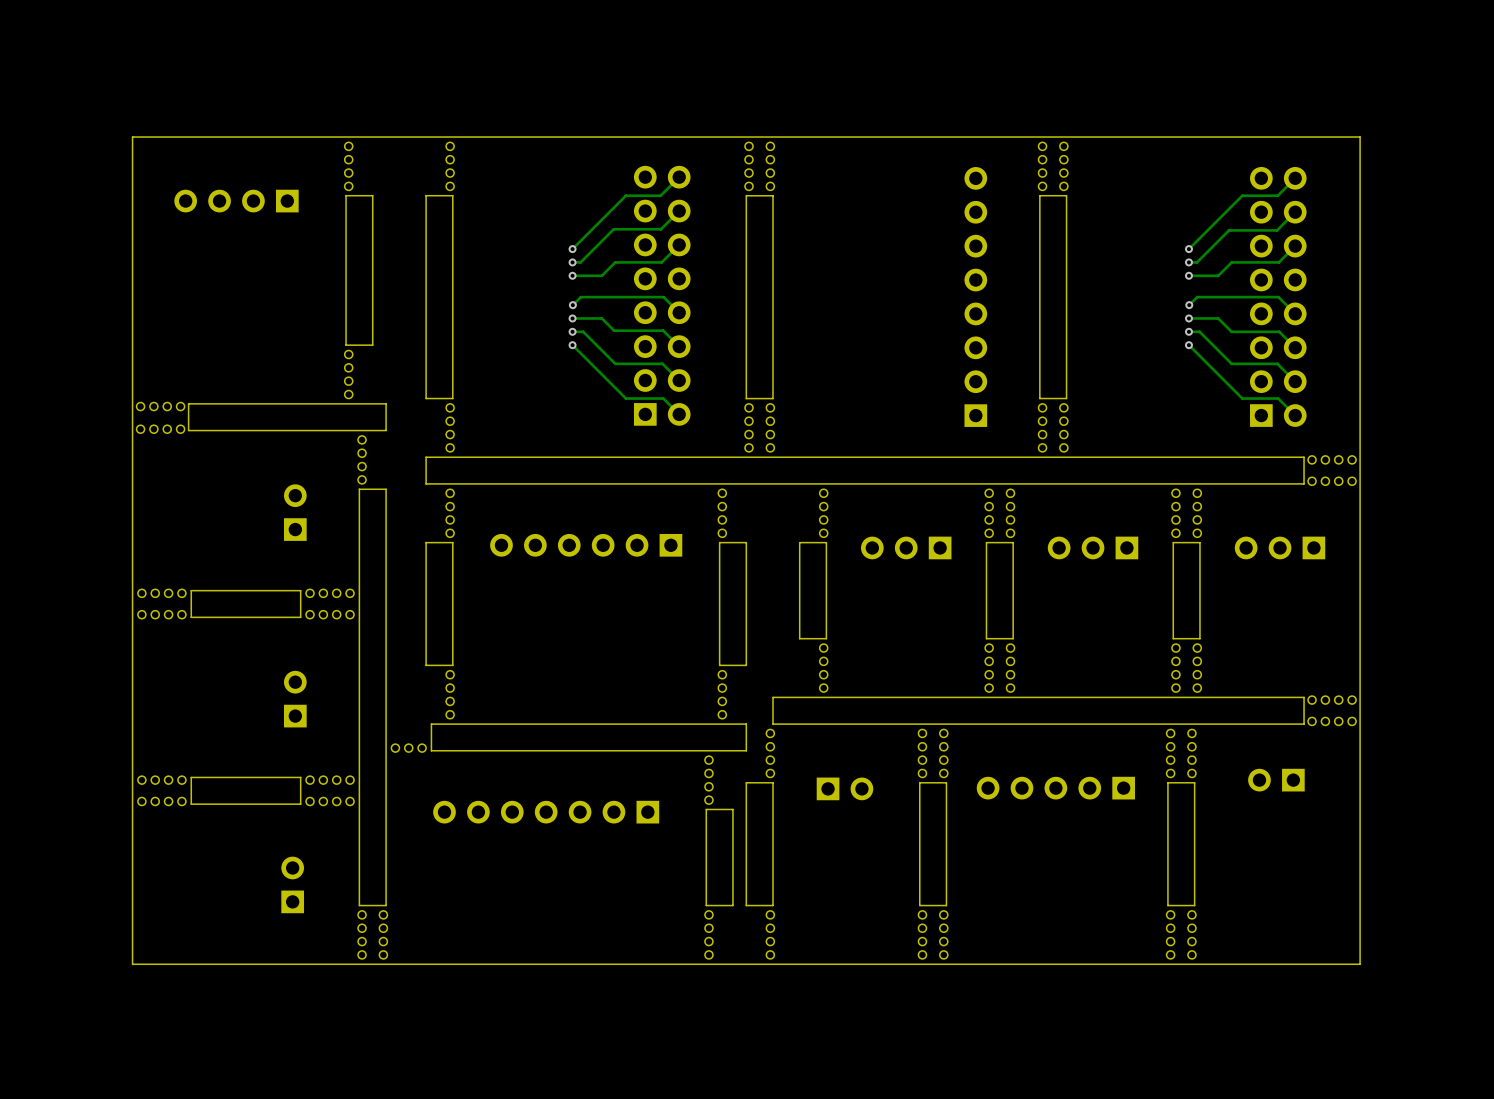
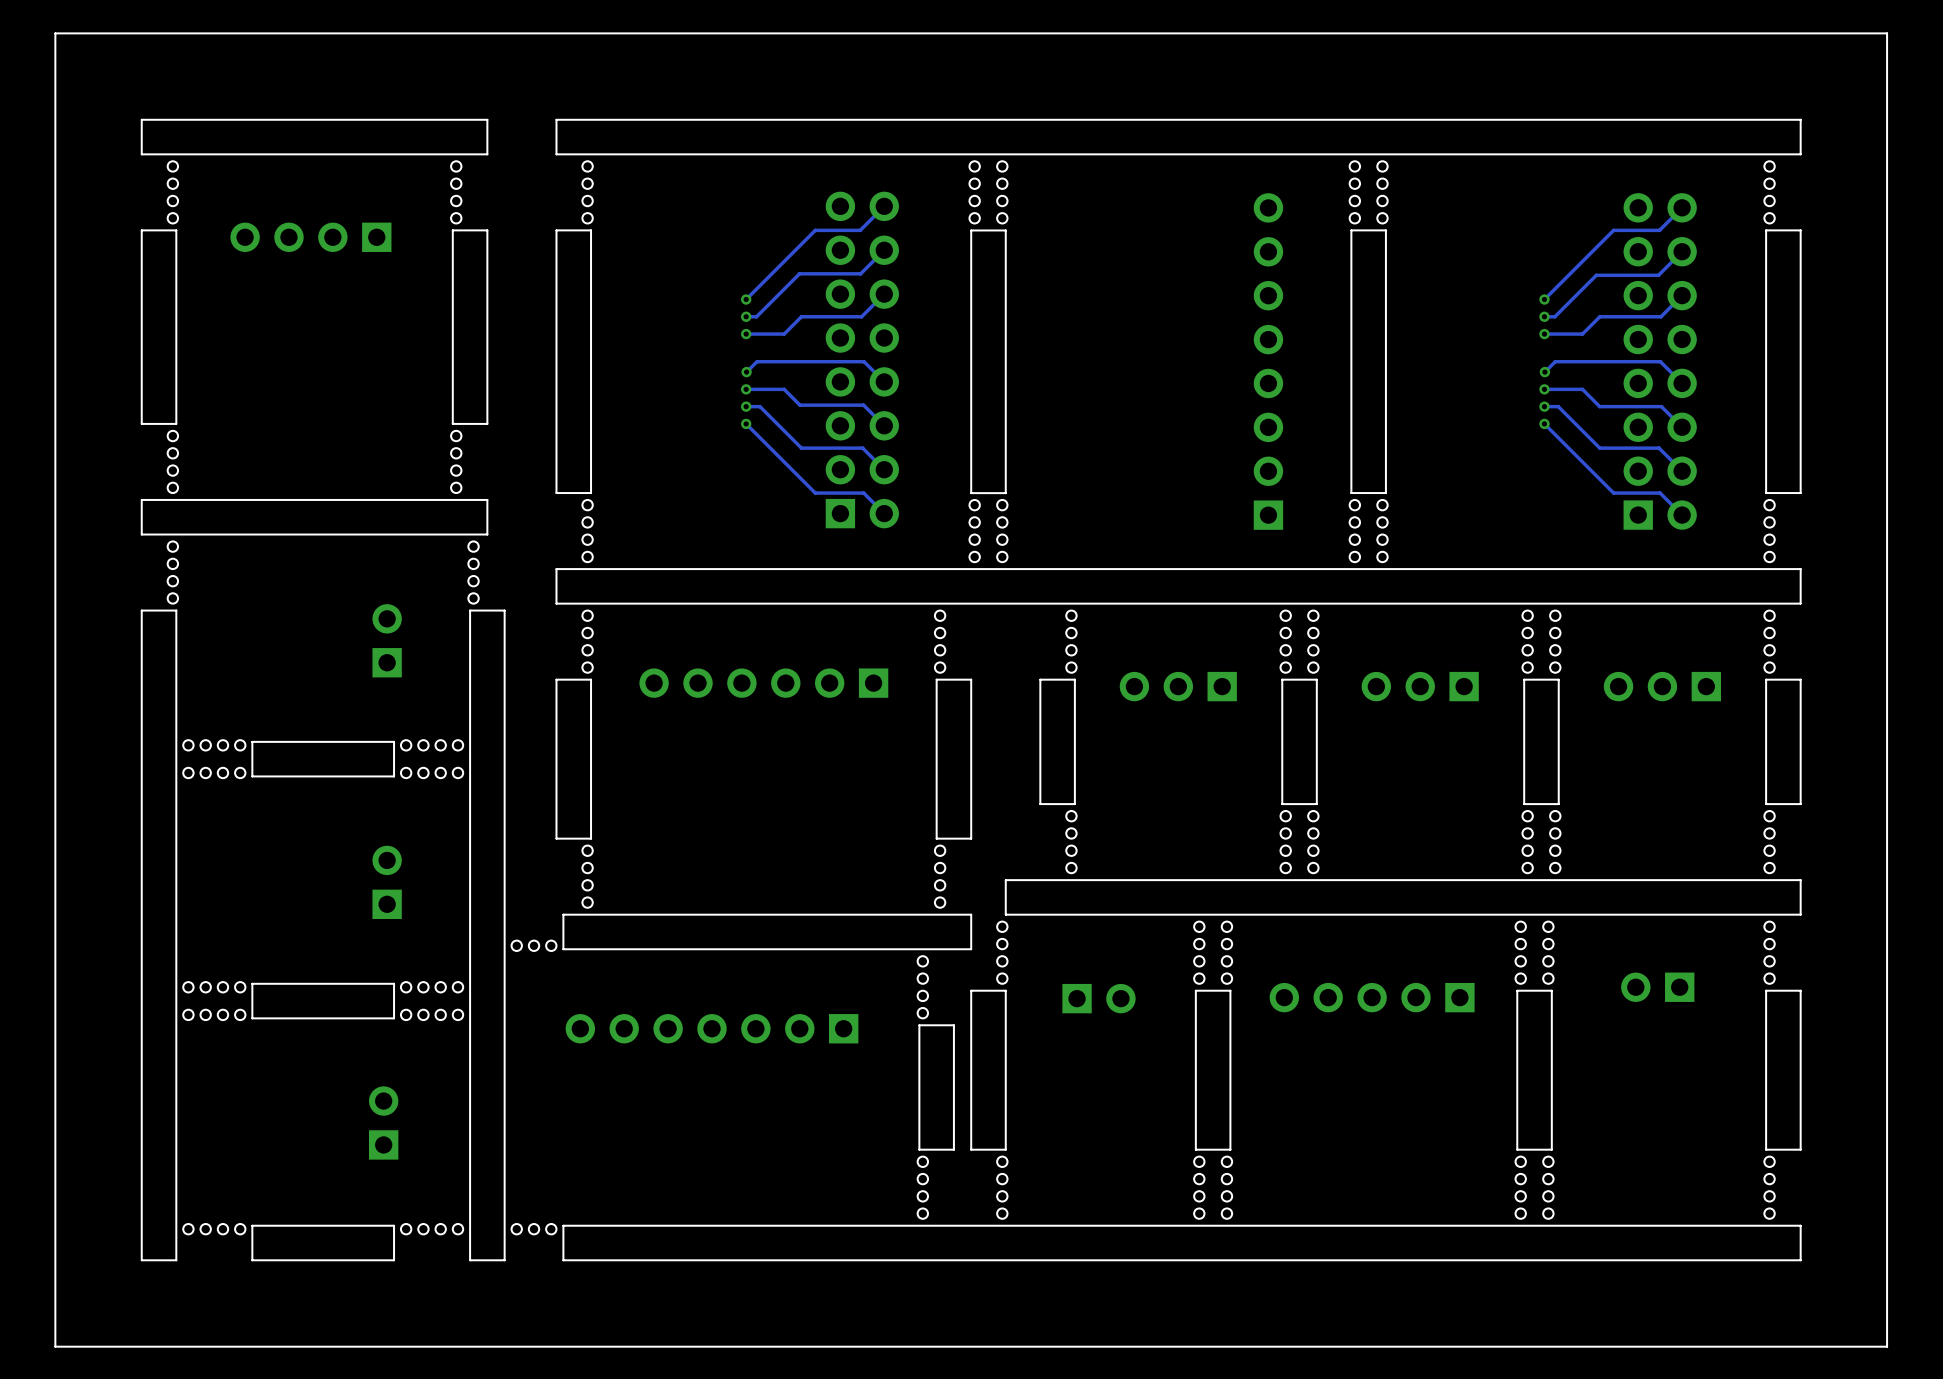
board edge: none -> (1887, 33) (55, 33) (55, 1346) (1887, 1346) (1887, 33)
board edge: (132, 137) (132, 195) -> (176, 423) (141, 423) (141, 230) (176, 230)
board edge: (426, 137) (372, 137) -> (176, 154) (141, 154) (141, 119) (487, 119) (487, 154)
board edge: (1360, 137) (1360, 195) -> (1766, 493) (1800, 493) (1800, 230) (1766, 230)
board edge: none -> (1766, 154) (1800, 154) (1800, 119) (556, 119) (556, 154)
round board edge: none -> [167, 160, 179, 173]
round board edge: none -> [1763, 160, 1776, 173]
round board edge: none -> [167, 178, 179, 190]
round board edge: none -> [1763, 178, 1776, 190]
round board edge: none -> [167, 195, 179, 207]
round board edge: none -> [1763, 195, 1776, 207]
round board edge: none -> [167, 212, 179, 224]
round board edge: none -> [1763, 212, 1776, 224]
board edge: (132, 345) (132, 489) -> (176, 1225) (176, 1260) (141, 1260) (141, 610) (176, 610)
round board edge: none -> [167, 430, 179, 442]
round board edge: none -> [167, 447, 179, 459]
round board edge: none -> [167, 464, 179, 477]
round board edge: none -> [167, 482, 179, 494]
board edge: (1360, 398) (1360, 542) -> none
round board edge: [136, 402, 145, 411] -> none
round board edge: [149, 402, 159, 411] -> none
round board edge: [162, 402, 172, 411] -> none
round board edge: [176, 402, 185, 411] -> none
board edge: (188, 403) (188, 430) -> (248, 499) (141, 499) (141, 534) (248, 534)
board edge: (372, 403) (386, 403) (386, 430) (372, 430) -> (487, 499) (487, 534)
round board edge: none -> [1763, 499, 1776, 511]
round board edge: none -> [1763, 516, 1776, 529]
round board edge: [136, 424, 145, 434] -> none
round board edge: [149, 424, 159, 434] -> none
round board edge: [162, 424, 172, 434] -> none
round board edge: [176, 424, 185, 434] -> none
round board edge: none -> [1763, 534, 1776, 546]
round board edge: none -> [167, 540, 179, 553]
round board edge: none -> [1763, 551, 1776, 563]
round board edge: none -> [167, 558, 179, 570]
round board edge: [1307, 455, 1317, 465] -> none
round board edge: [1321, 455, 1330, 465] -> none
round board edge: [1334, 455, 1344, 465] -> none
round board edge: [1347, 455, 1357, 465] -> none
board edge: (1304, 457) (1304, 483) -> (1693, 569) (1800, 569) (1800, 603) (1693, 603)
round board edge: none -> [167, 575, 179, 587]
round board edge: none -> [167, 592, 179, 605]
round board edge: [1307, 476, 1317, 486] -> none
round board edge: [1321, 476, 1330, 486] -> none
round board edge: [1334, 476, 1344, 486] -> none
round board edge: [1347, 476, 1357, 486] -> none
round board edge: none -> [1763, 610, 1776, 622]
round board edge: none -> [1763, 627, 1776, 639]
round board edge: none -> [1763, 644, 1776, 656]
round board edge: none -> [1763, 661, 1776, 674]
board edge: (1360, 638) (1360, 782) -> (1766, 804) (1800, 804) (1800, 679) (1766, 679)
round board edge: none -> [1763, 810, 1776, 822]
round board edge: none -> [1763, 827, 1776, 840]
round board edge: none -> [1763, 845, 1776, 857]
round board edge: none -> [1763, 862, 1776, 874]
round board edge: [1307, 695, 1317, 705] -> none
round board edge: [1321, 695, 1330, 705] -> none
round board edge: [1334, 695, 1344, 705] -> none
round board edge: [1347, 695, 1357, 705] -> none
board edge: (1304, 697) (1304, 724) -> (1693, 880) (1800, 880) (1800, 914) (1693, 914)
round board edge: [1307, 717, 1317, 726] -> none
round board edge: [1321, 717, 1330, 726] -> none
round board edge: [1334, 717, 1344, 726] -> none
round board edge: [1347, 717, 1357, 726] -> none
round board edge: none -> [1763, 921, 1776, 933]
round board edge: none -> [1763, 938, 1776, 950]
round board edge: none -> [1763, 955, 1776, 967]
round board edge: none -> [1763, 973, 1776, 985]
board edge: (386, 905) (359, 905) -> (504, 1149) (504, 1260) (470, 1260) (470, 1149)
board edge: (1360, 905) (1360, 964) -> (1766, 1149) (1800, 1149) (1800, 990) (1766, 990)
round board edge: [357, 910, 367, 920] -> none
round board edge: [379, 910, 388, 920] -> none
round board edge: none -> [1763, 1156, 1776, 1168]
round board edge: [357, 923, 367, 933] -> none
round board edge: [379, 923, 388, 933] -> none
round board edge: none -> [1763, 1173, 1776, 1185]
round board edge: [357, 937, 367, 946] -> none
round board edge: [379, 937, 388, 946] -> none
round board edge: none -> [1763, 1190, 1776, 1202]
round board edge: [357, 950, 367, 960] -> none
round board edge: [379, 950, 388, 960] -> none
round board edge: none -> [1763, 1208, 1776, 1220]
round board edge: none -> [182, 1223, 195, 1235]
round board edge: none -> [200, 1223, 212, 1235]
round board edge: none -> [217, 1223, 229, 1235]
round board edge: none -> [234, 1223, 246, 1235]
round board edge: none -> [400, 1223, 412, 1235]
round board edge: none -> [417, 1223, 430, 1235]
round board edge: none -> [435, 1223, 447, 1235]
round board edge: none -> [452, 1223, 464, 1235]
round board edge: none -> [511, 1223, 523, 1235]
round board edge: none -> [528, 1223, 540, 1235]
round board edge: none -> [545, 1223, 557, 1235]
board edge: (191, 964) (132, 964) -> (252, 1225) (252, 1260) (394, 1260) (394, 1225)
board edge: (431, 964) (300, 964) -> (563, 1225) (563, 1260) (1800, 1260) (1800, 1225) (1766, 1225)

